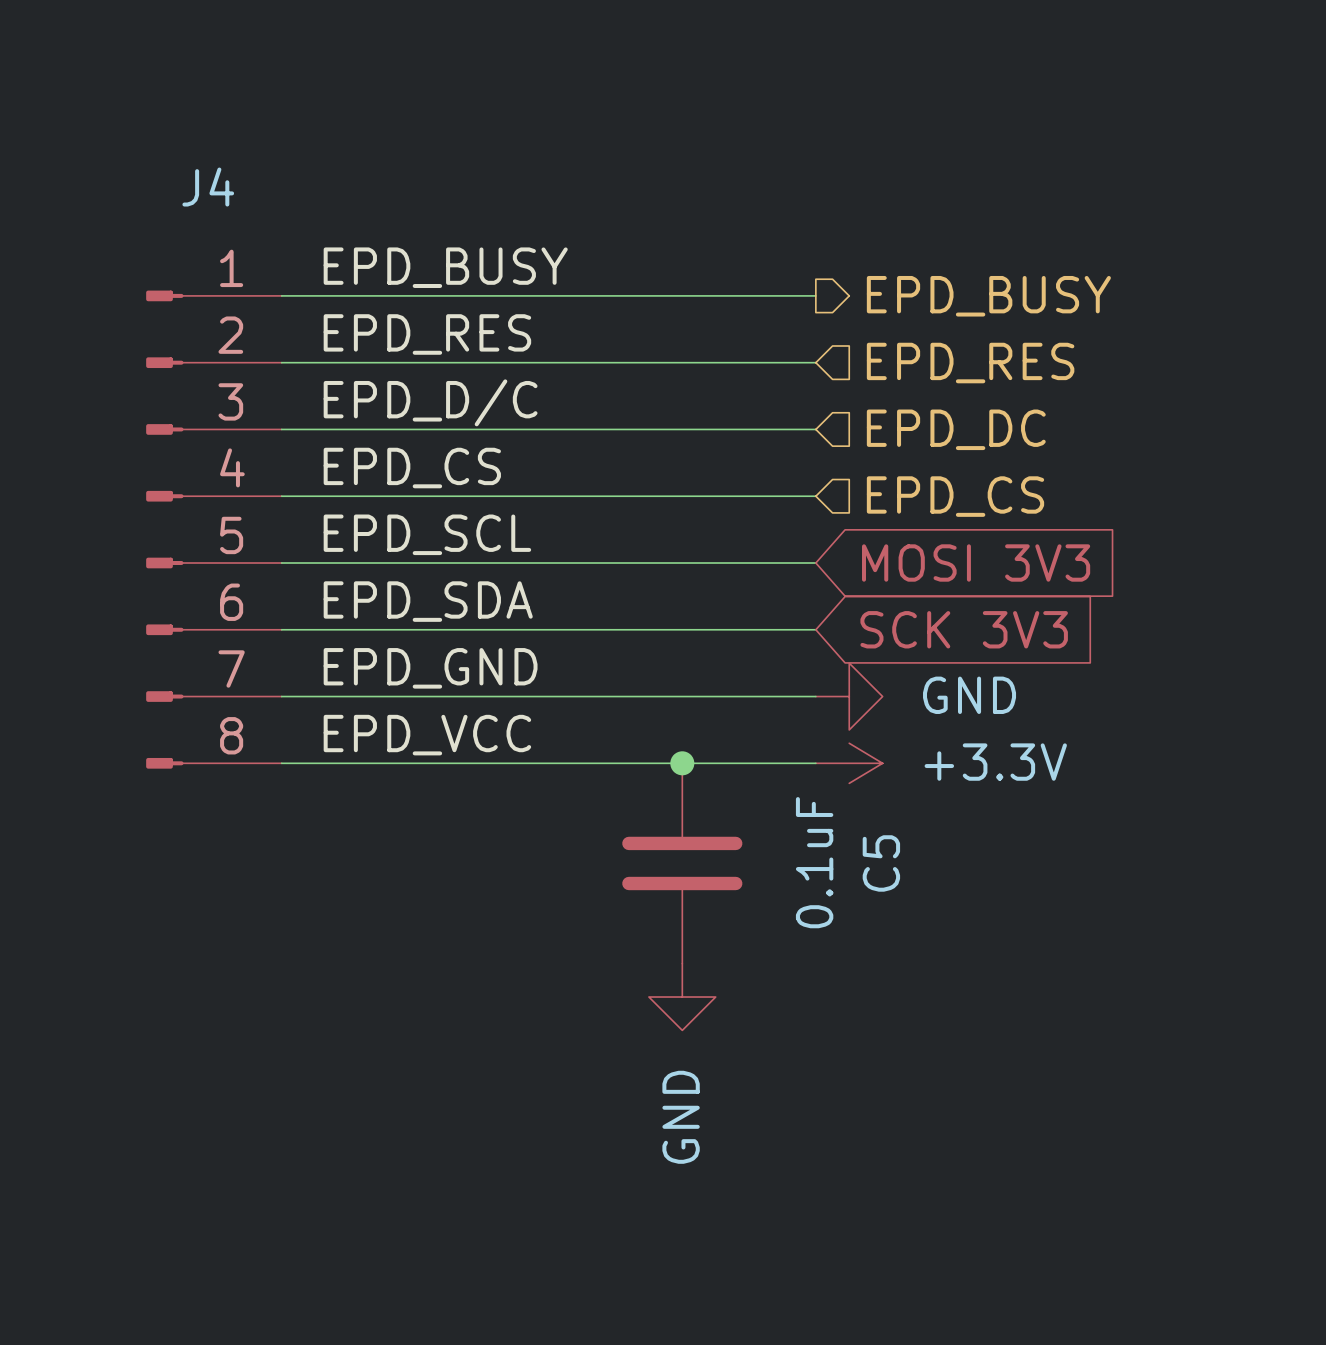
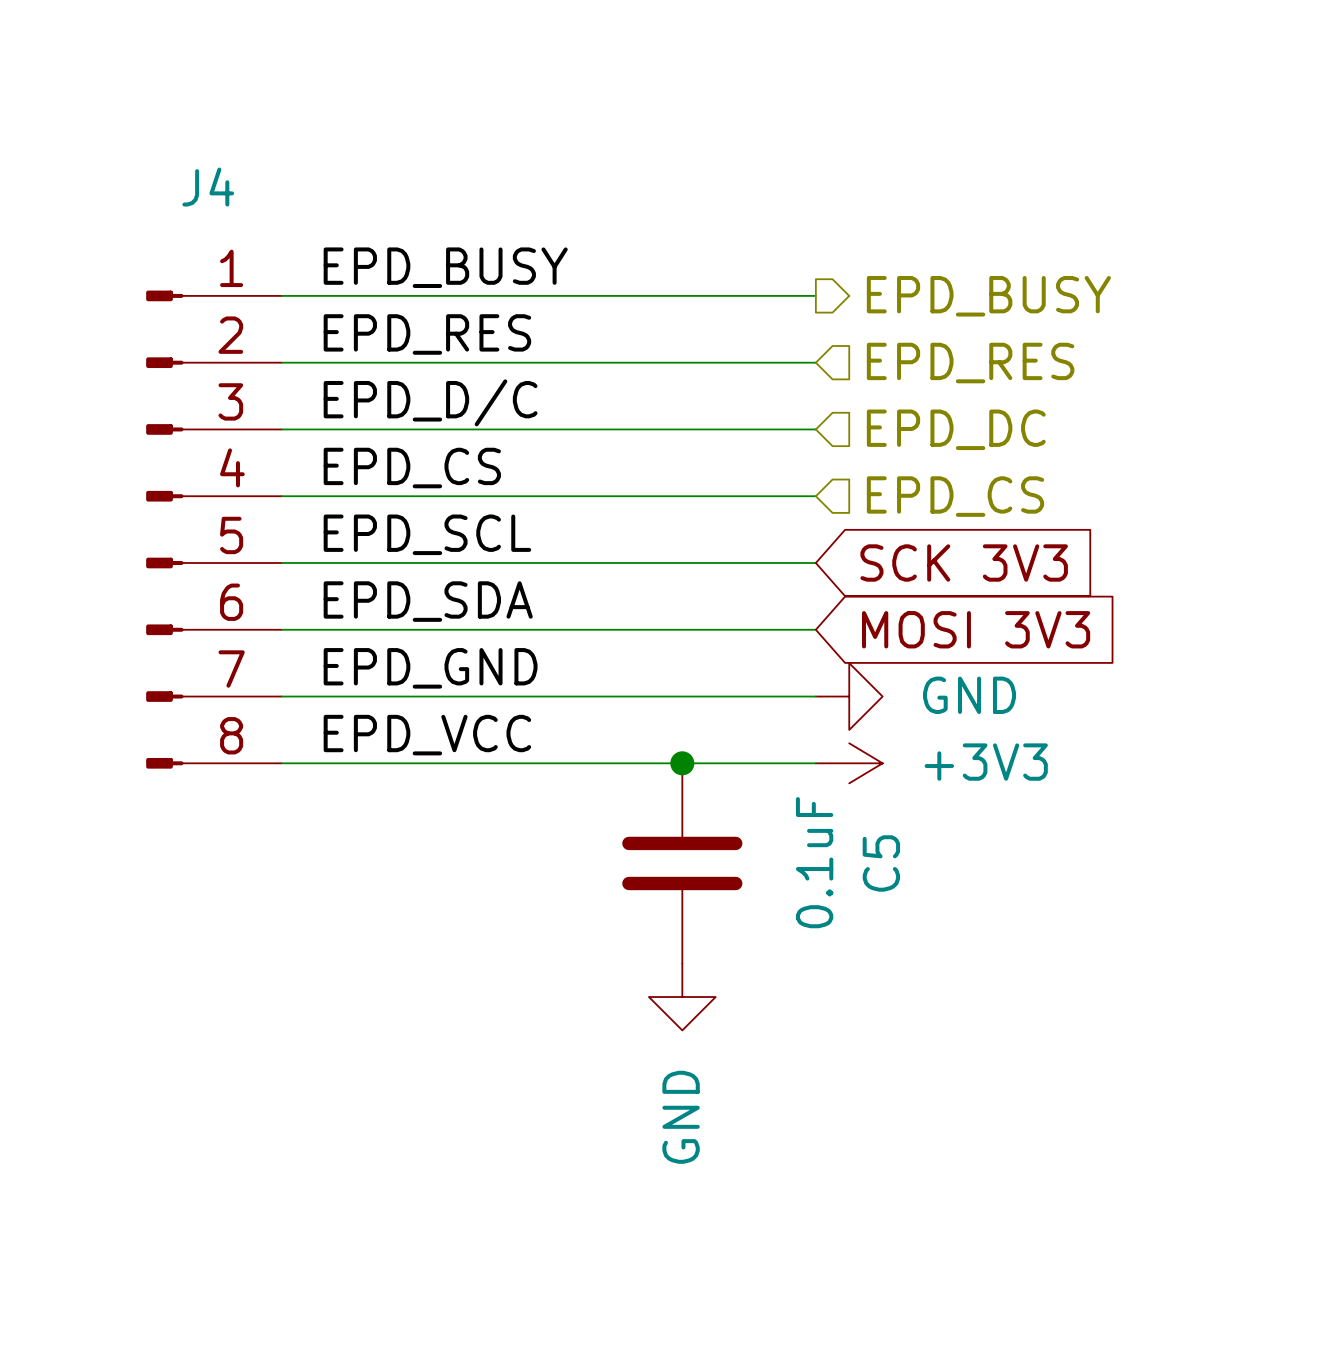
global label: MOSI 3V3 (976, 563) -> SCK 3V3 (964, 563)
global label: SCK 3V3 (964, 629) -> MOSI 3V3 (976, 629)
power symbol: +3.3V (849, 763) -> +3V3 (849, 763)

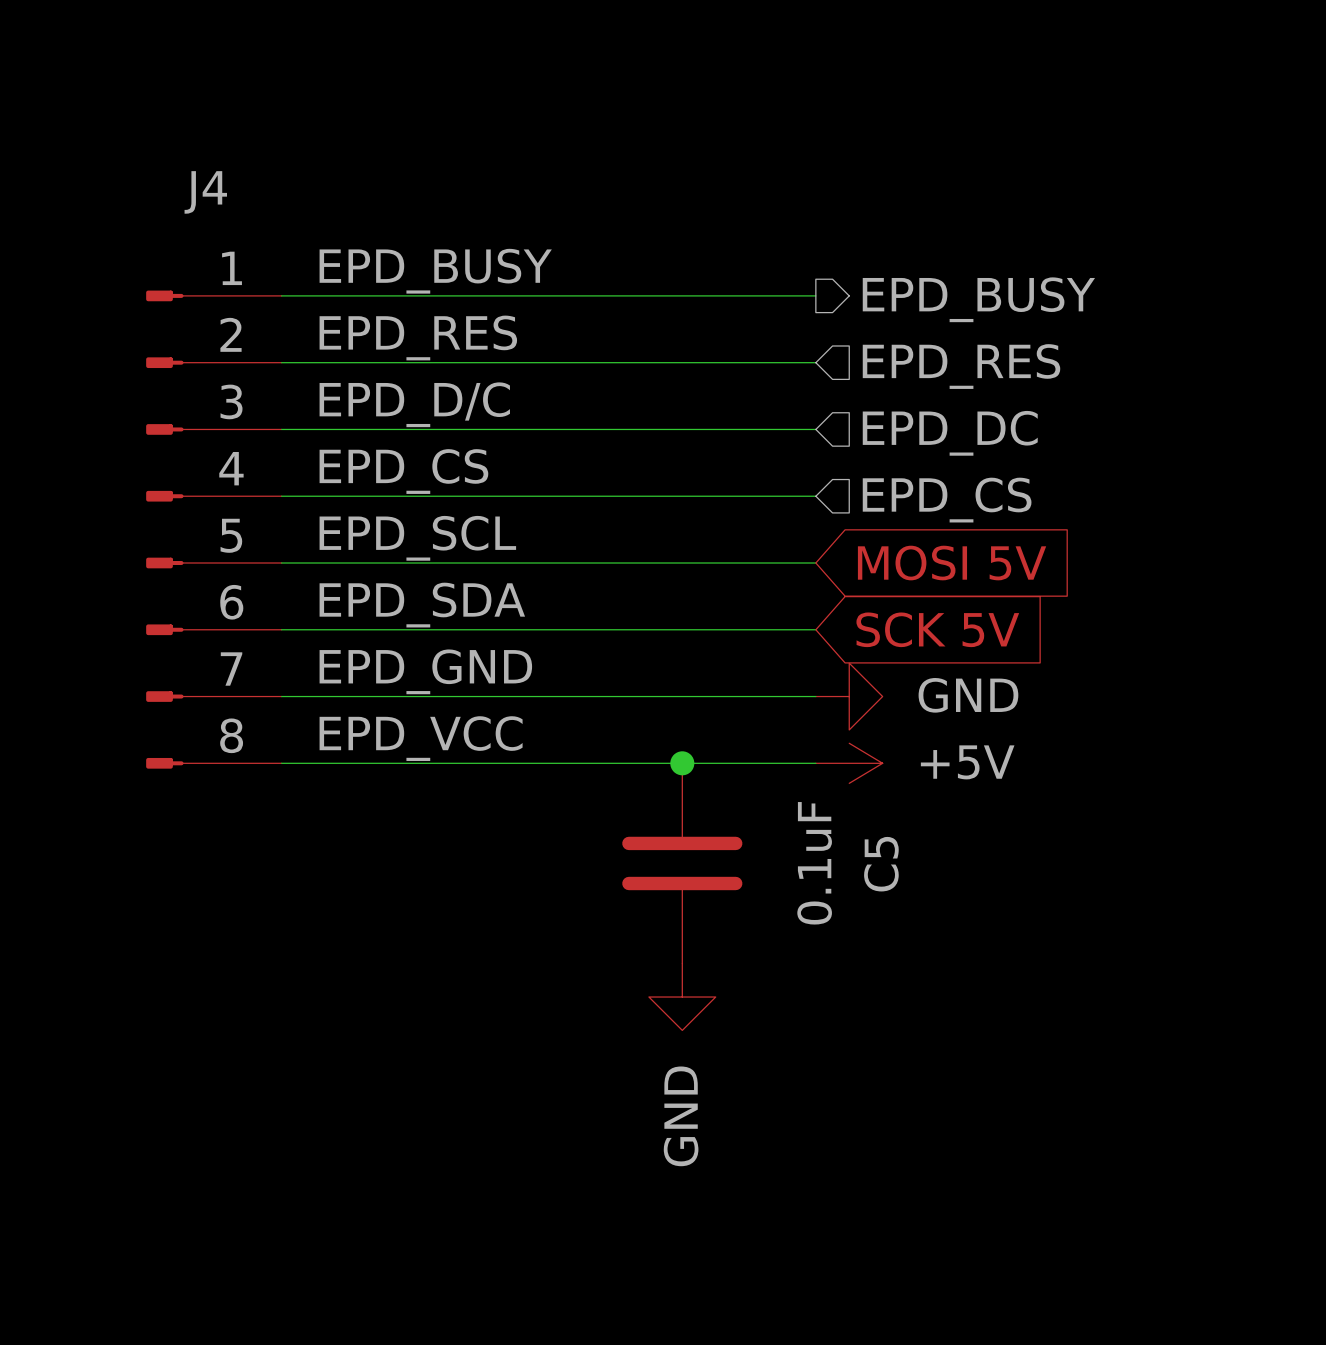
global label: SCK 3V3 (964, 563) -> MOSI 5V (952, 563)
global label: MOSI 3V3 (976, 629) -> SCK 5V (937, 629)
power symbol: +3V3 (849, 763) -> +5V (849, 763)

